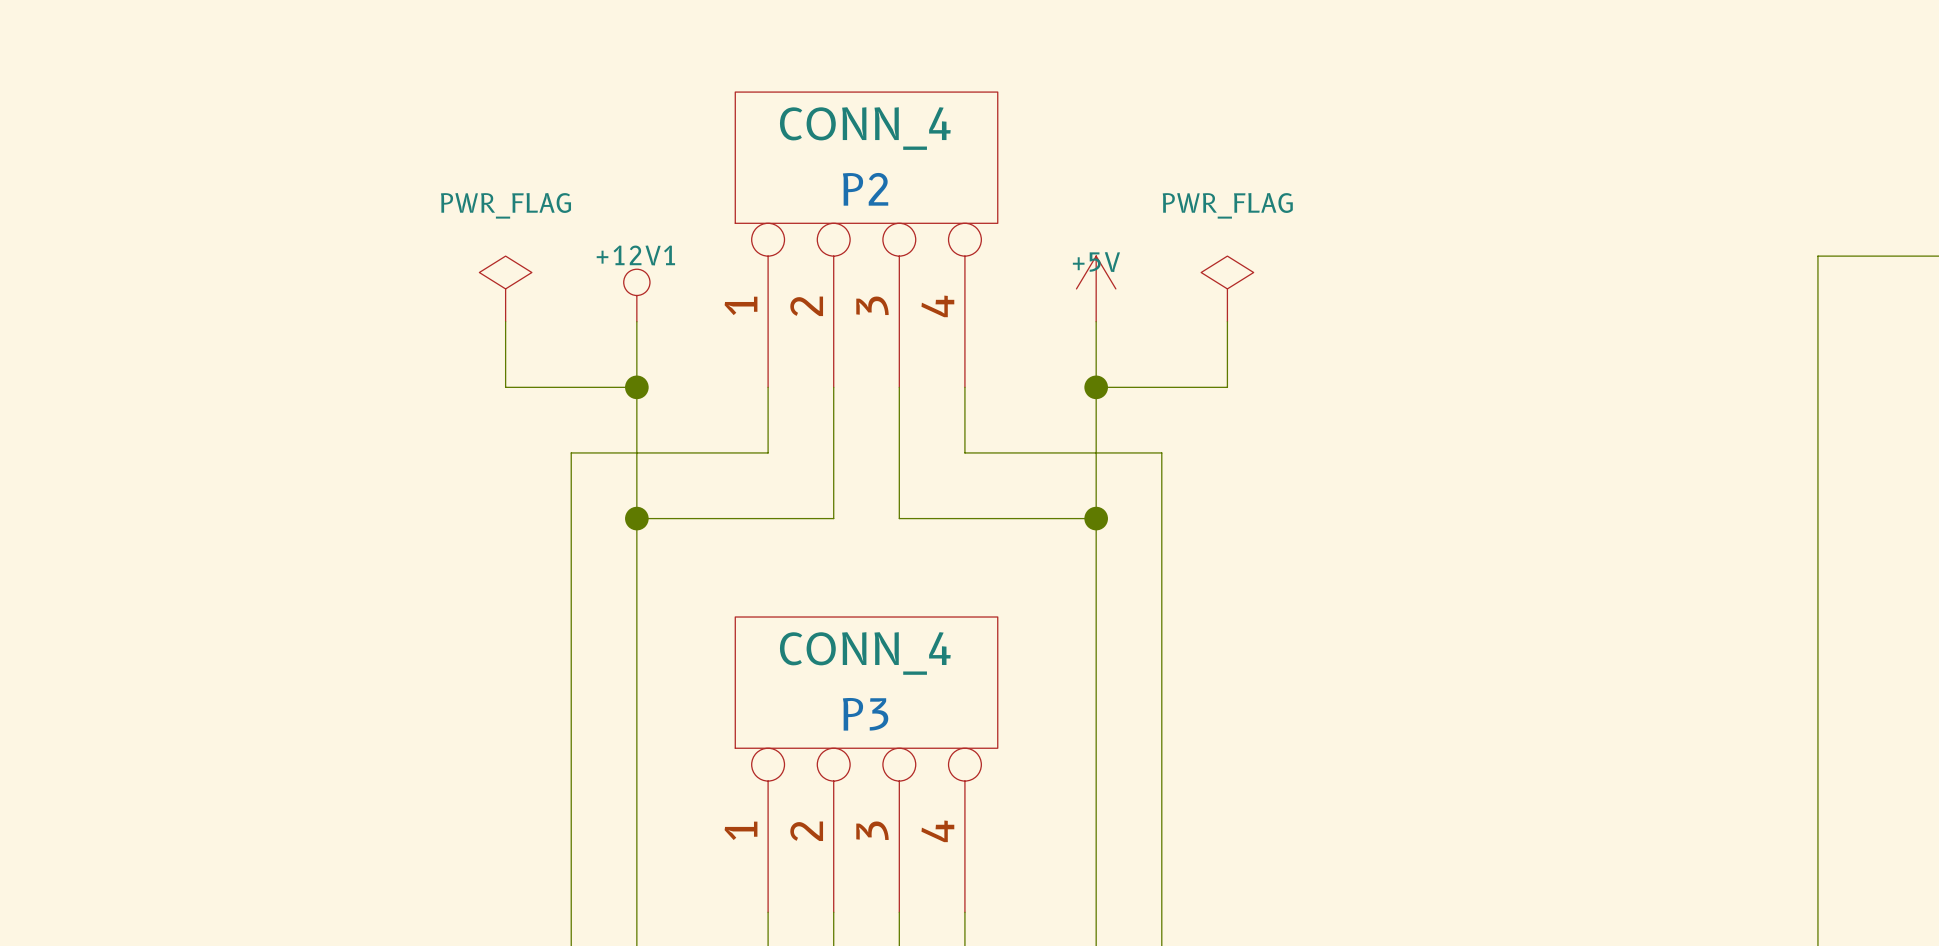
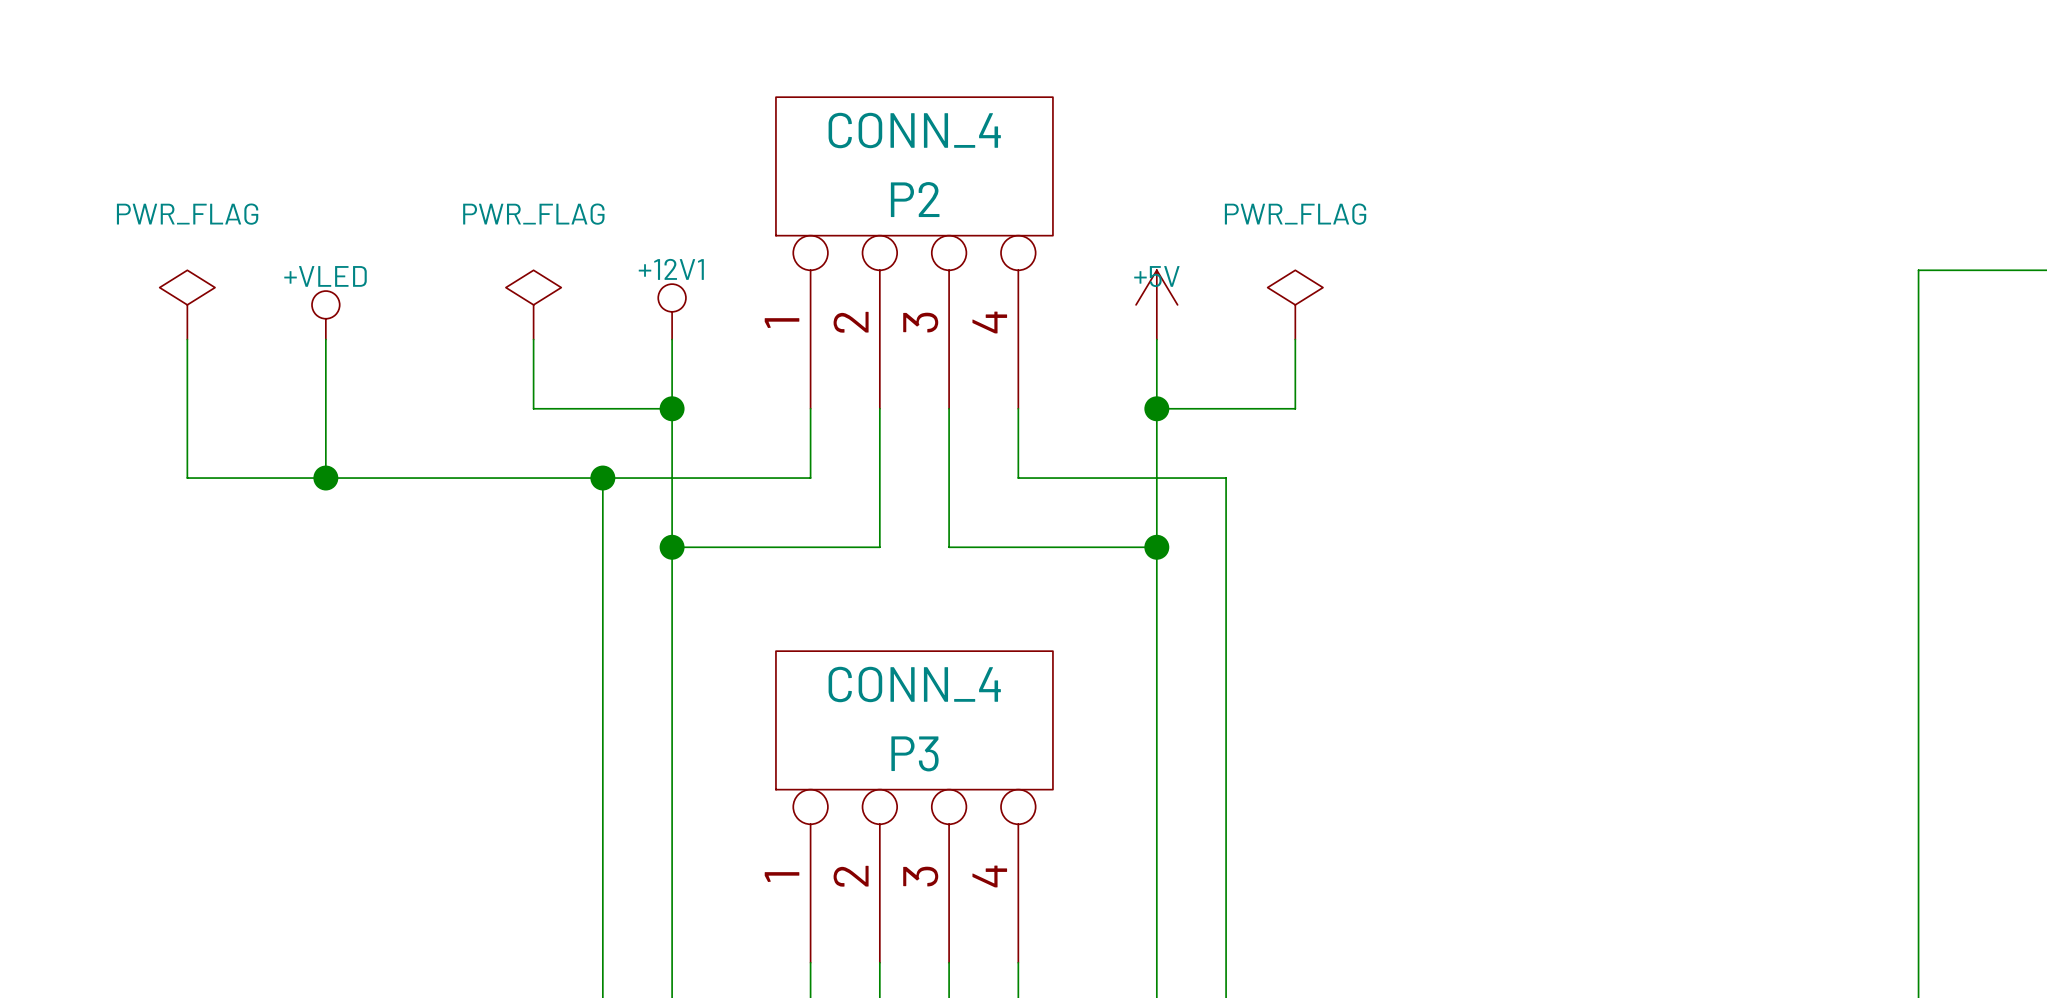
power symbol: none -> PWR_FLAG (187, 304)
power symbol: none -> +VLED (325, 315)
wire: none -> (187, 339) (187, 478) (602, 478)
wire: none -> (325, 339) (325, 478)
junction: none -> (325, 478)
junction: none -> (602, 478)

